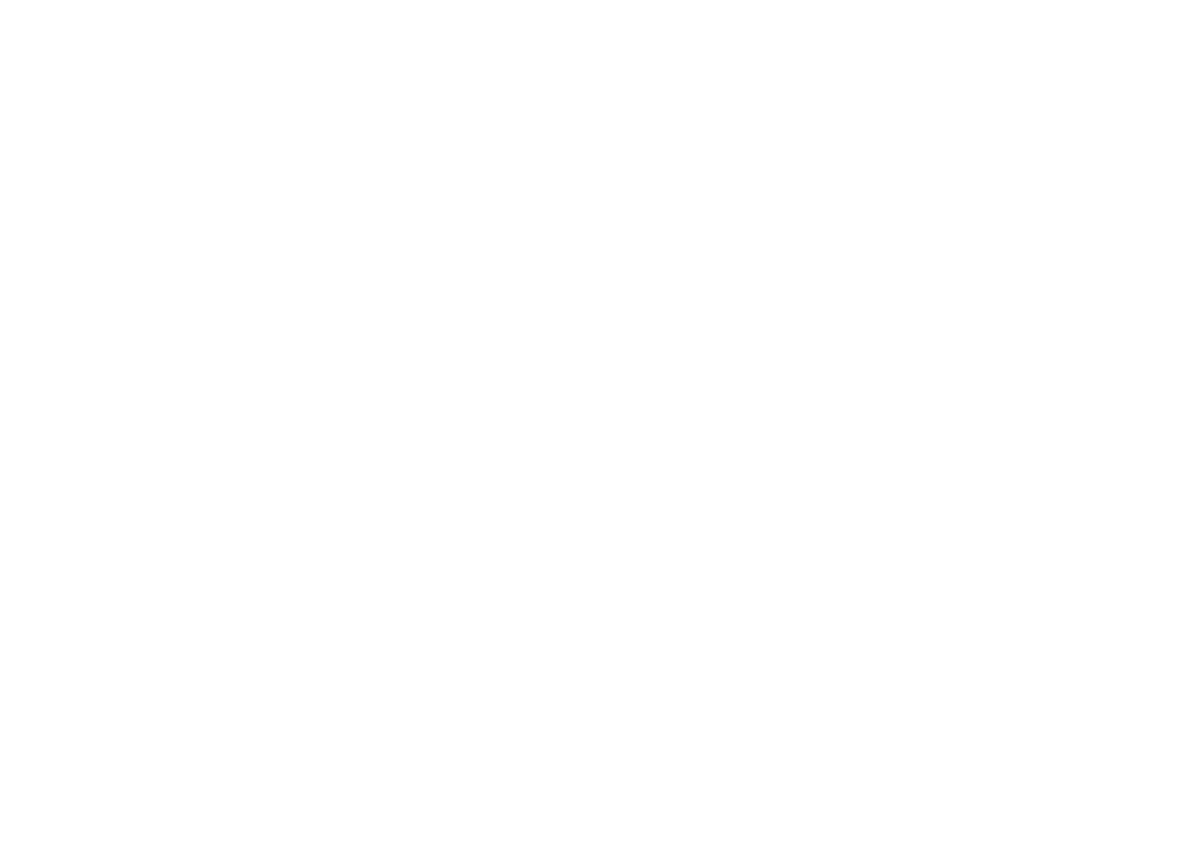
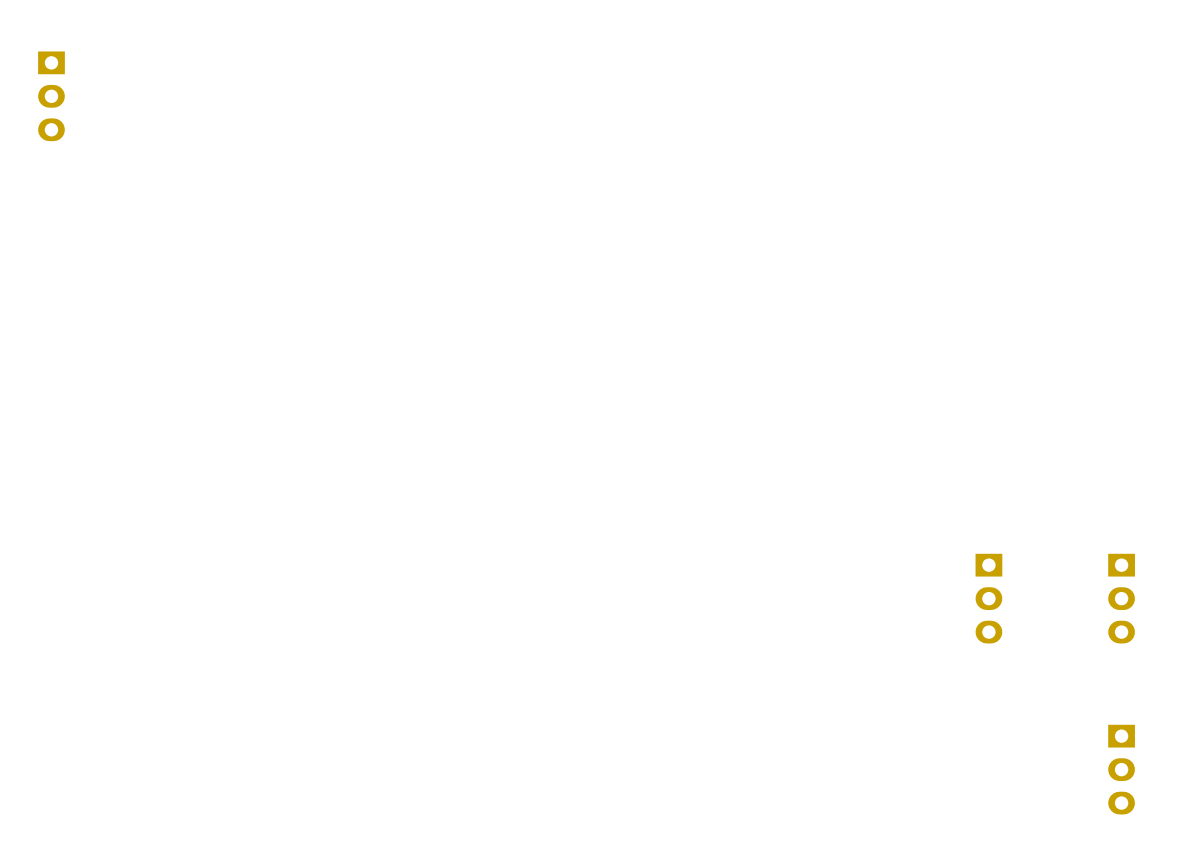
part: none -> (51, 96)
part: none -> (988, 598)
part: none -> (1121, 598)
part: none -> (1121, 769)

